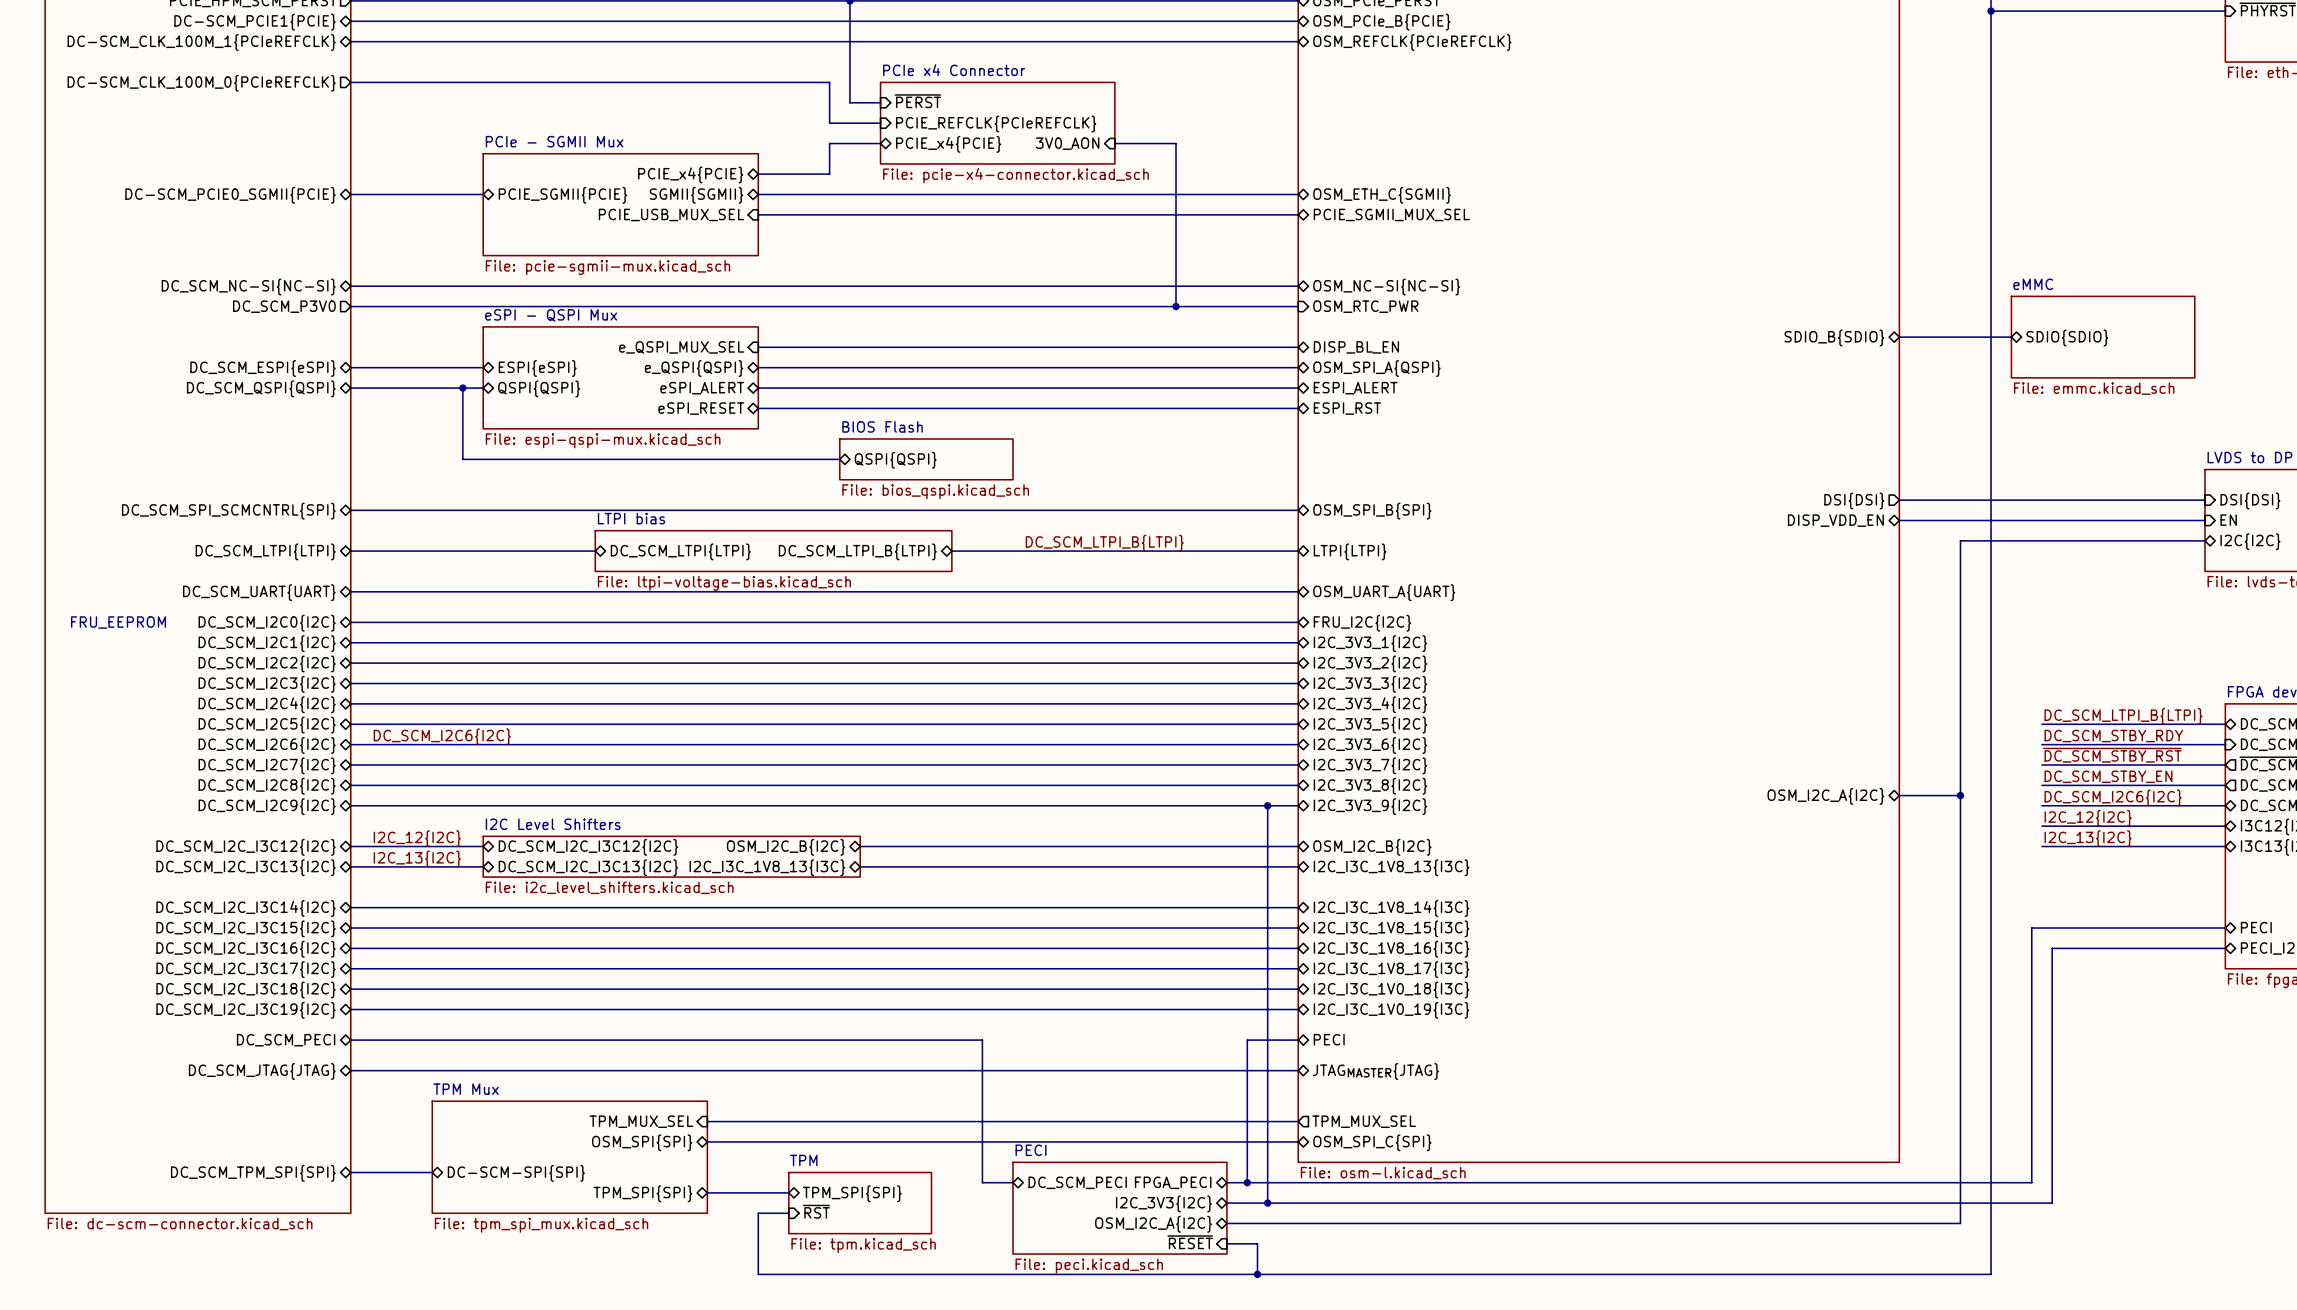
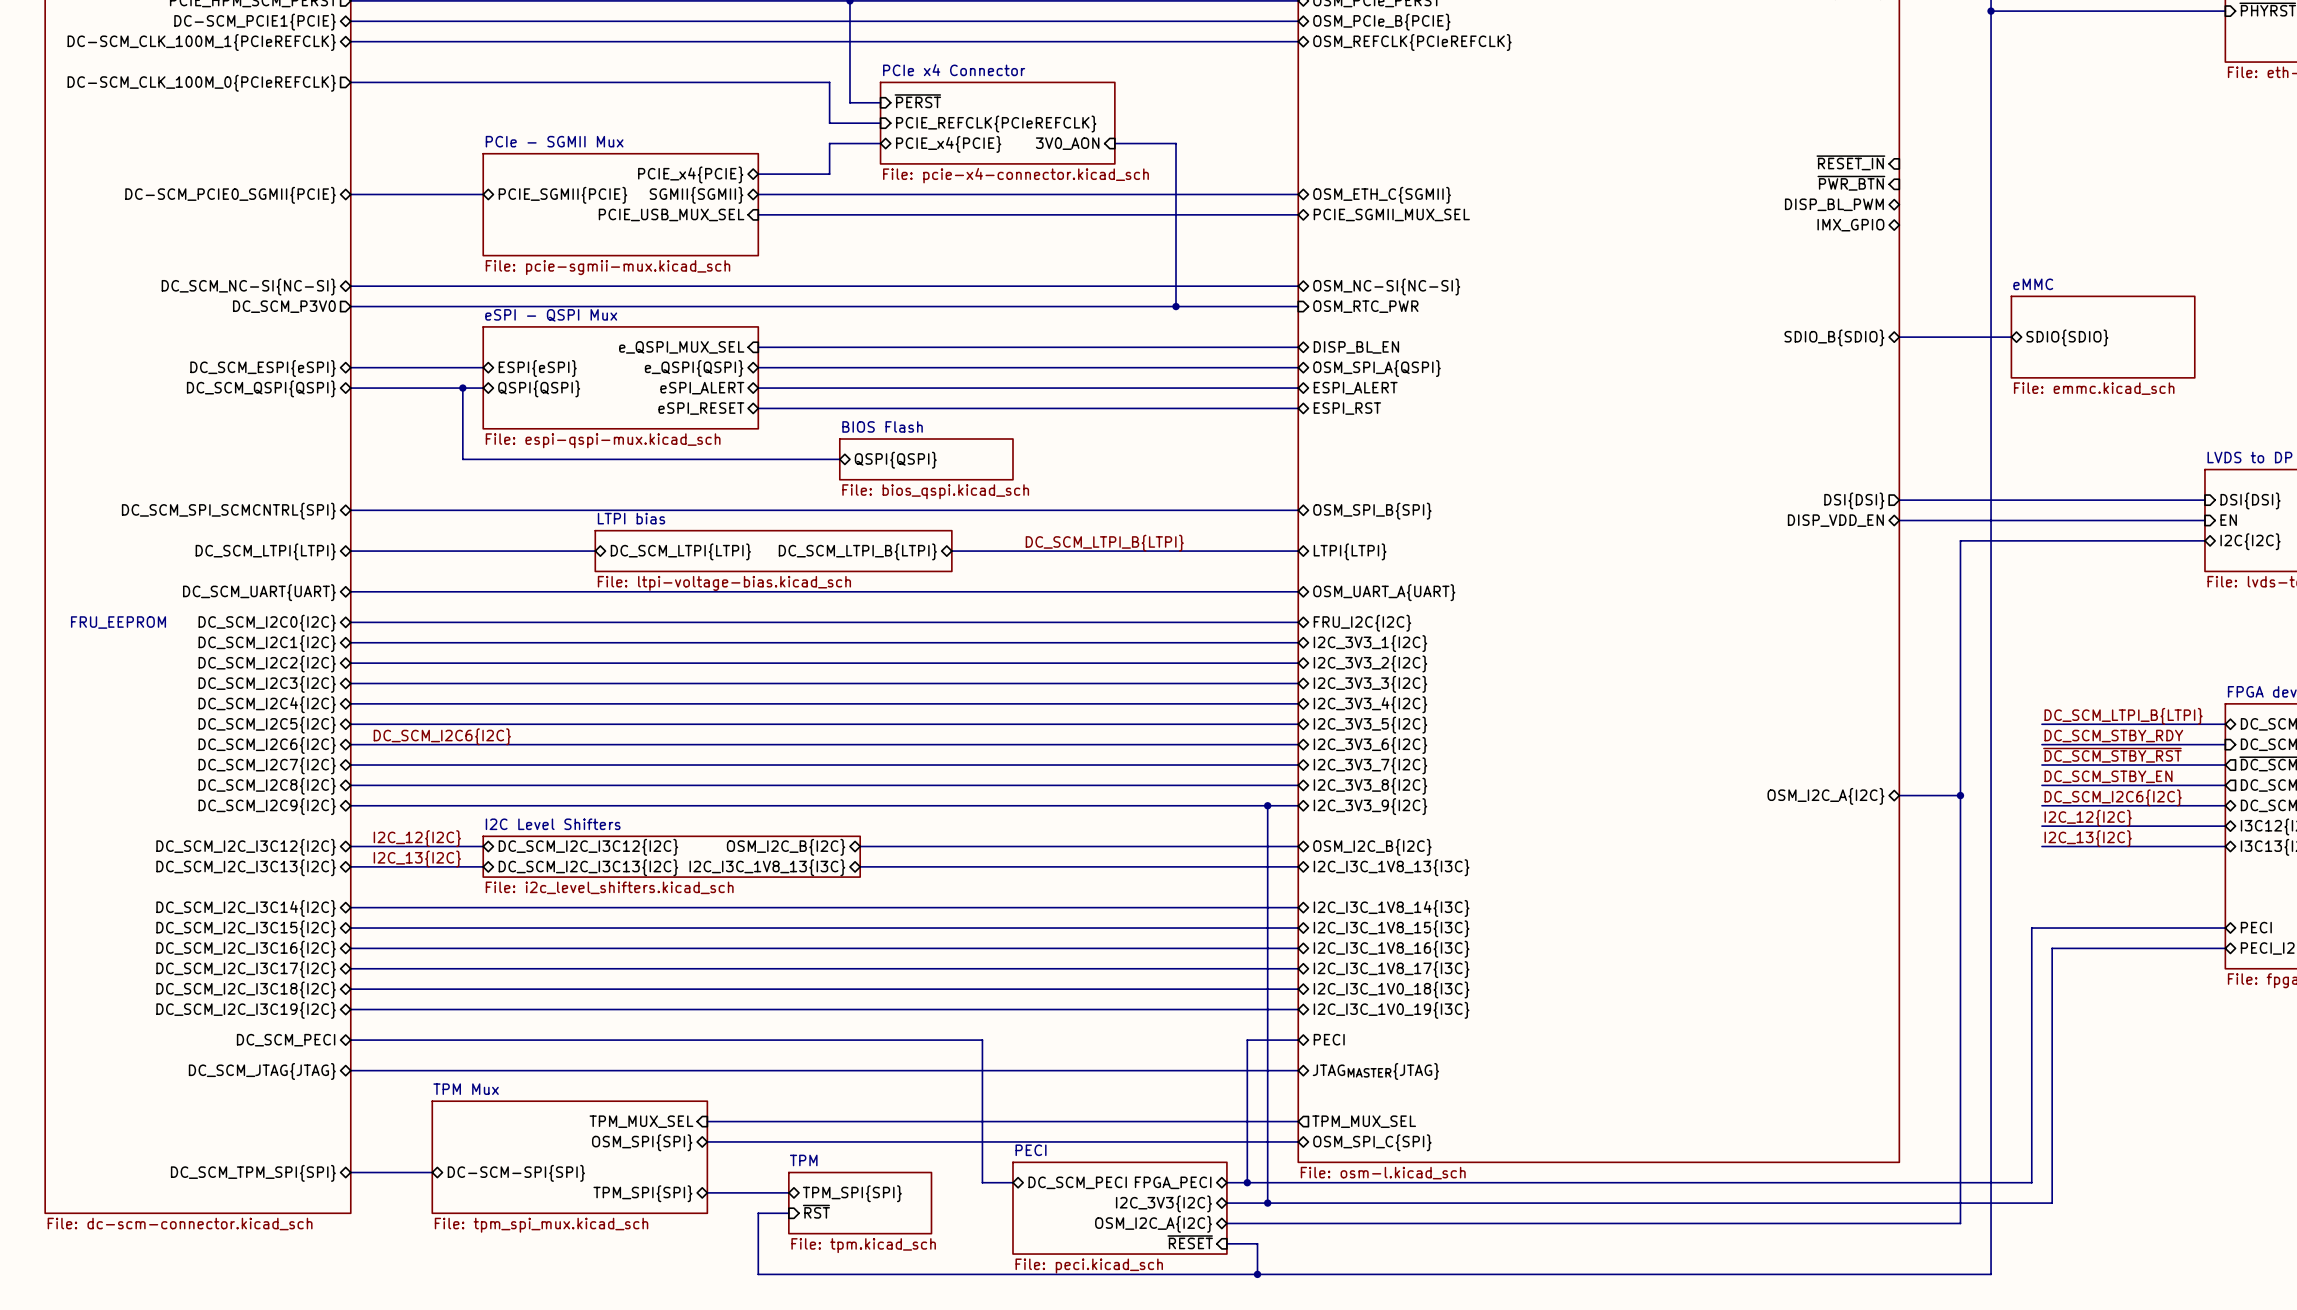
sheet pin: none -> ~{RESET_IN} (1850, 162)
sheet pin: none -> ~{PWR_BTN} (1851, 183)
sheet pin: none -> DISP_BL_PWM (1834, 204)
sheet pin: none -> IMX_GPIO (1850, 225)

